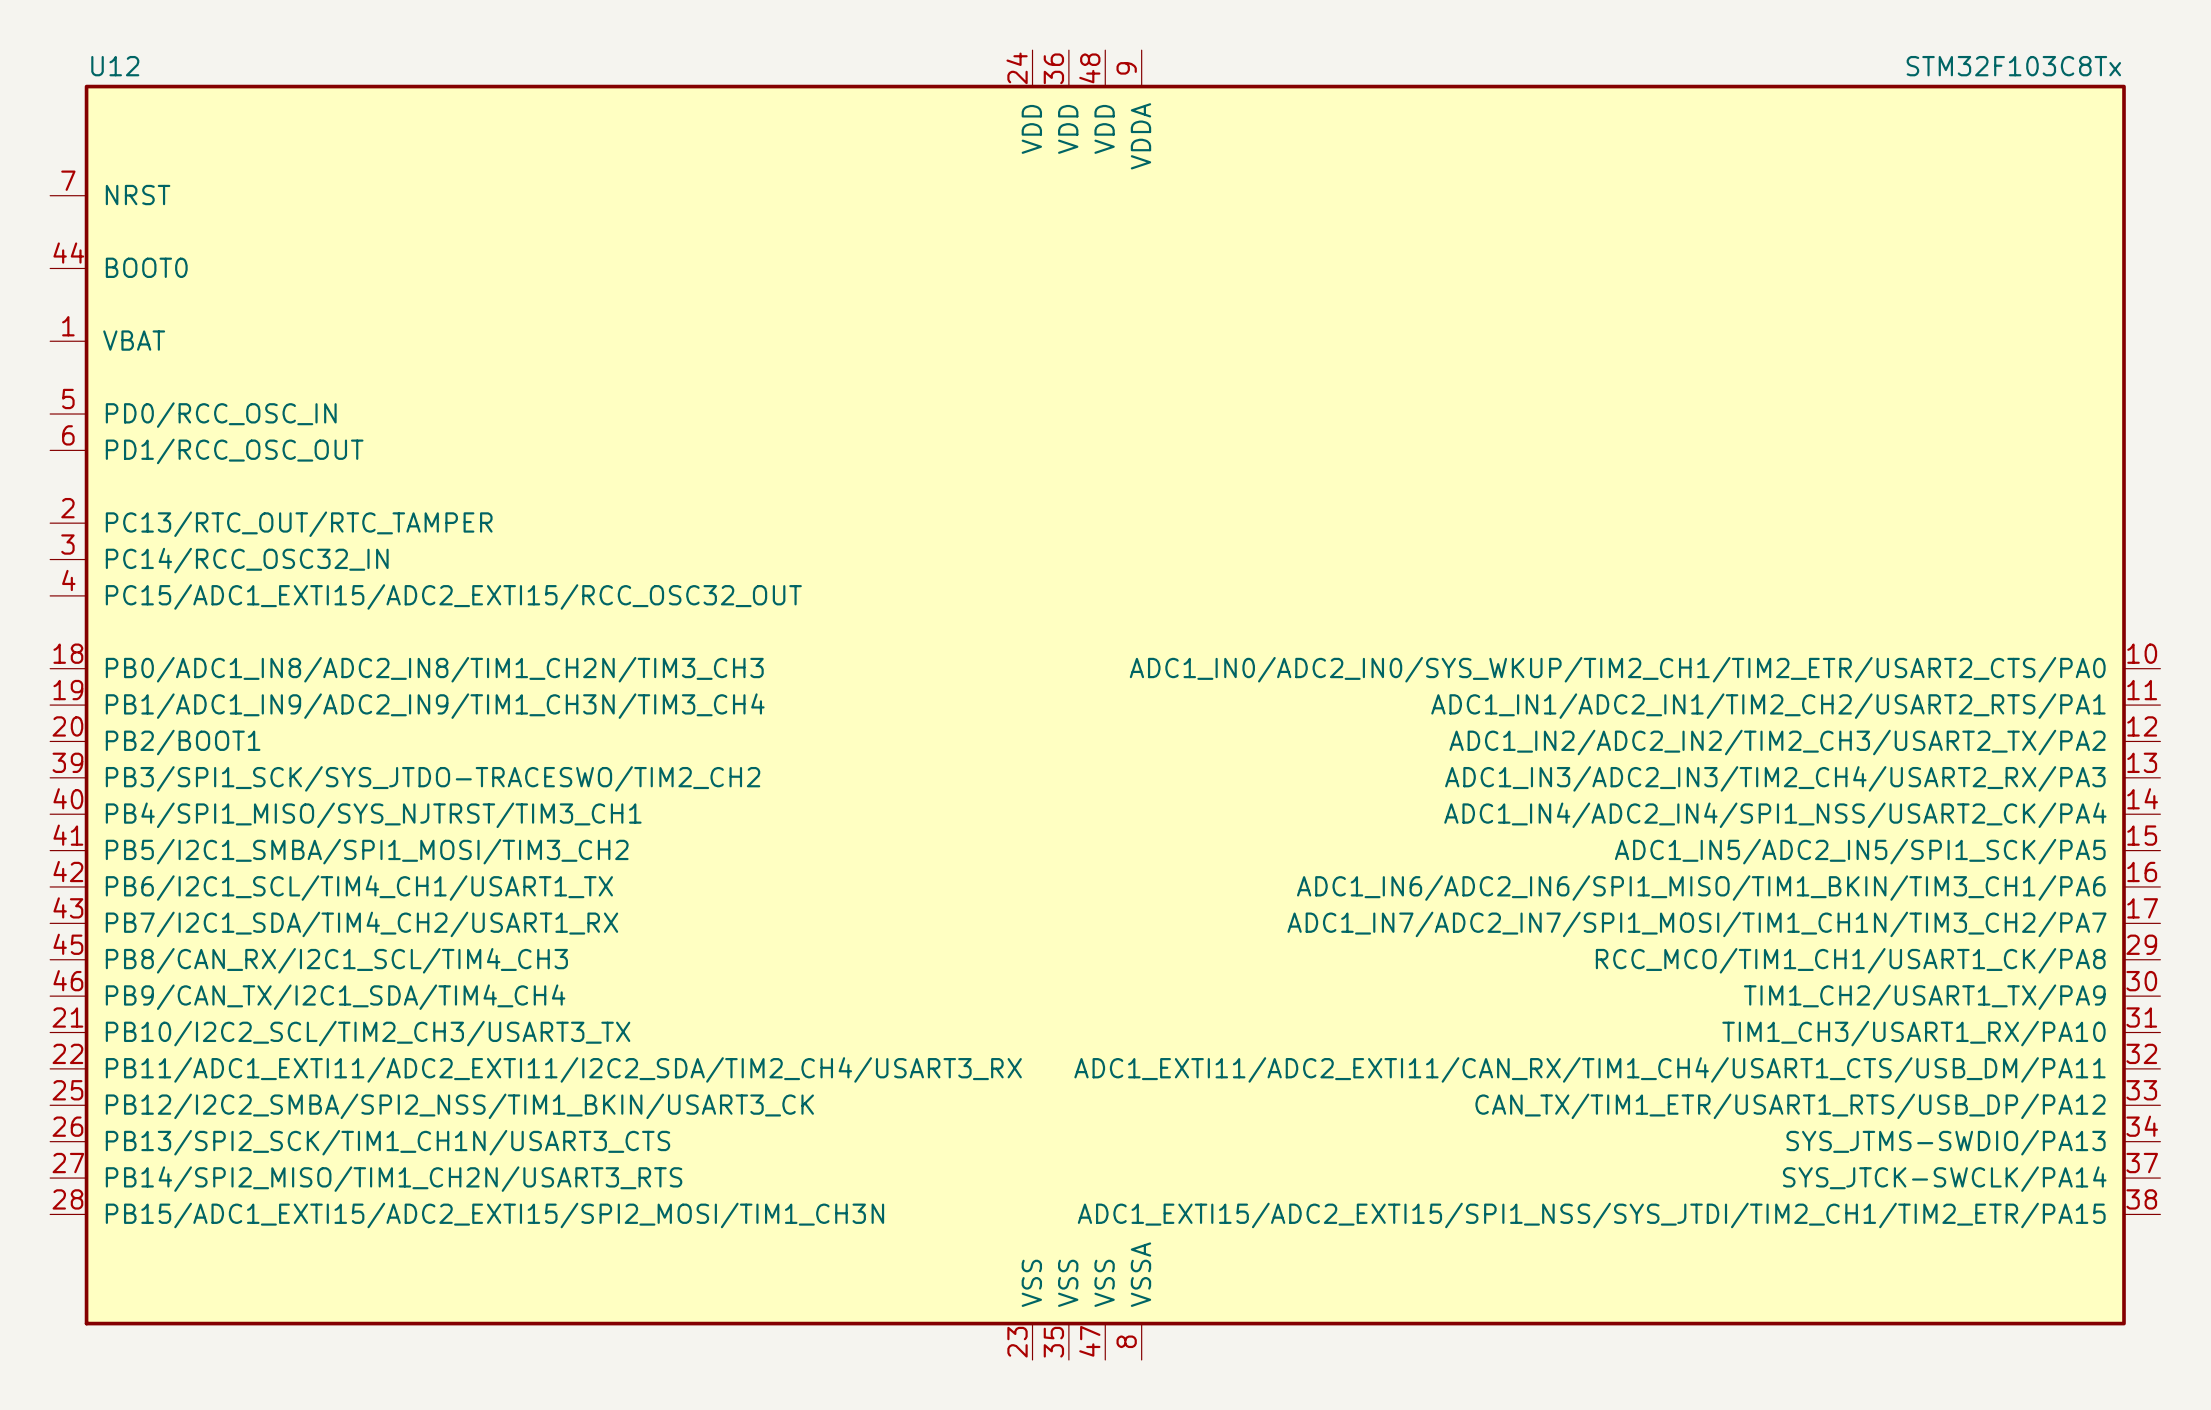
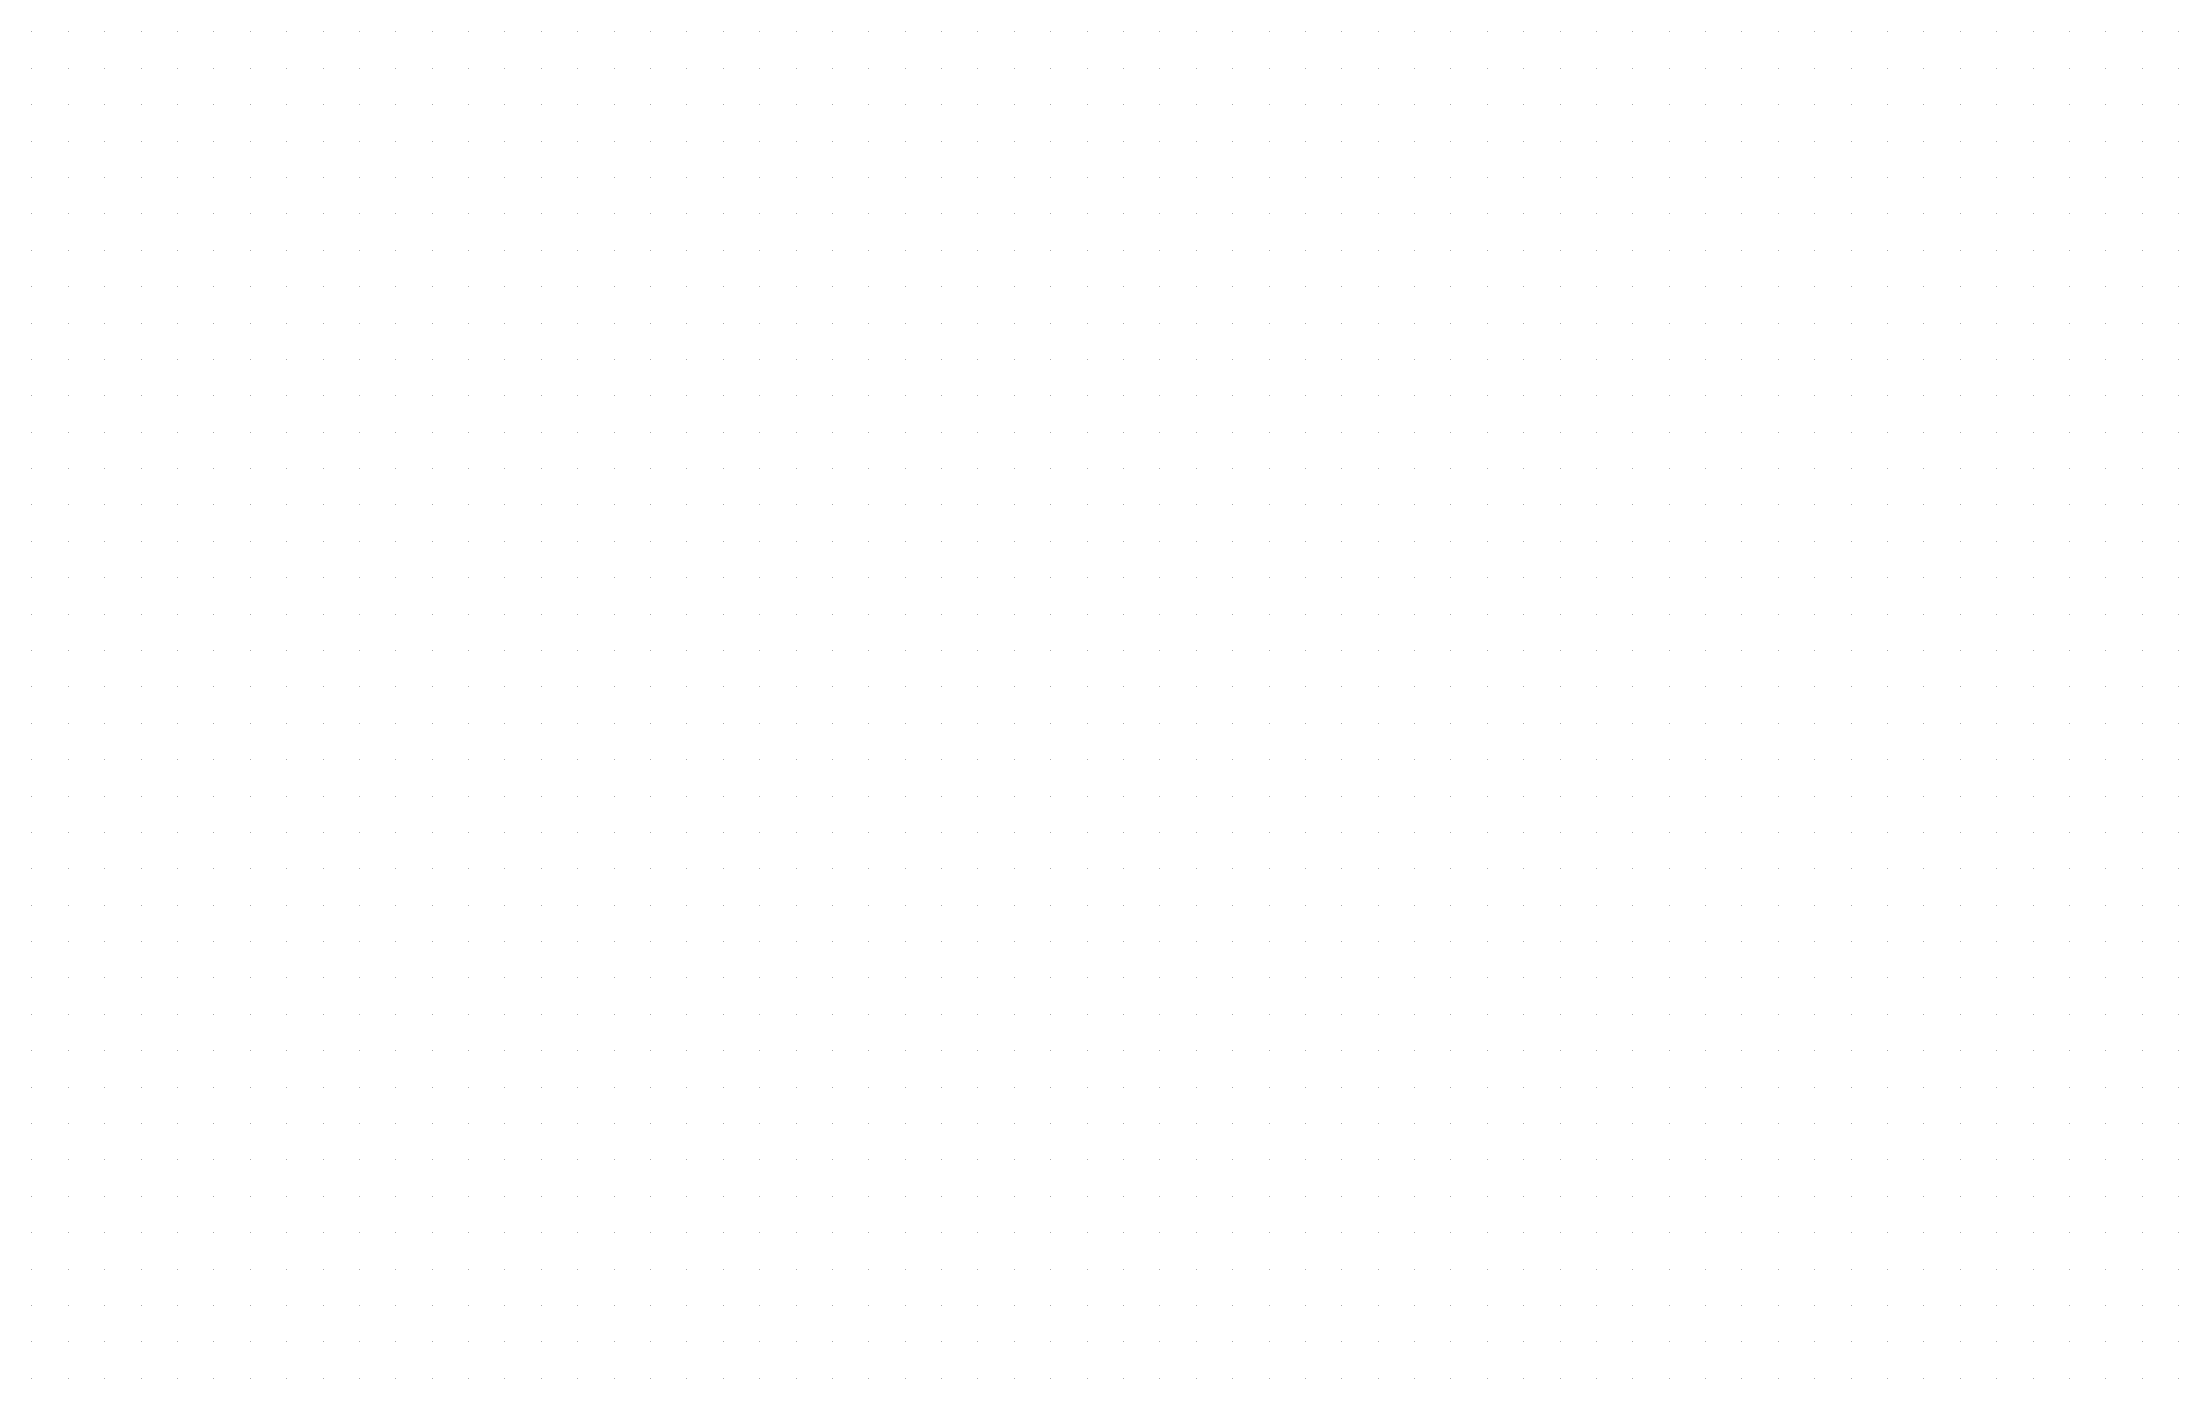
U12: STM32F103C8Tx (1105, 705) -> none

